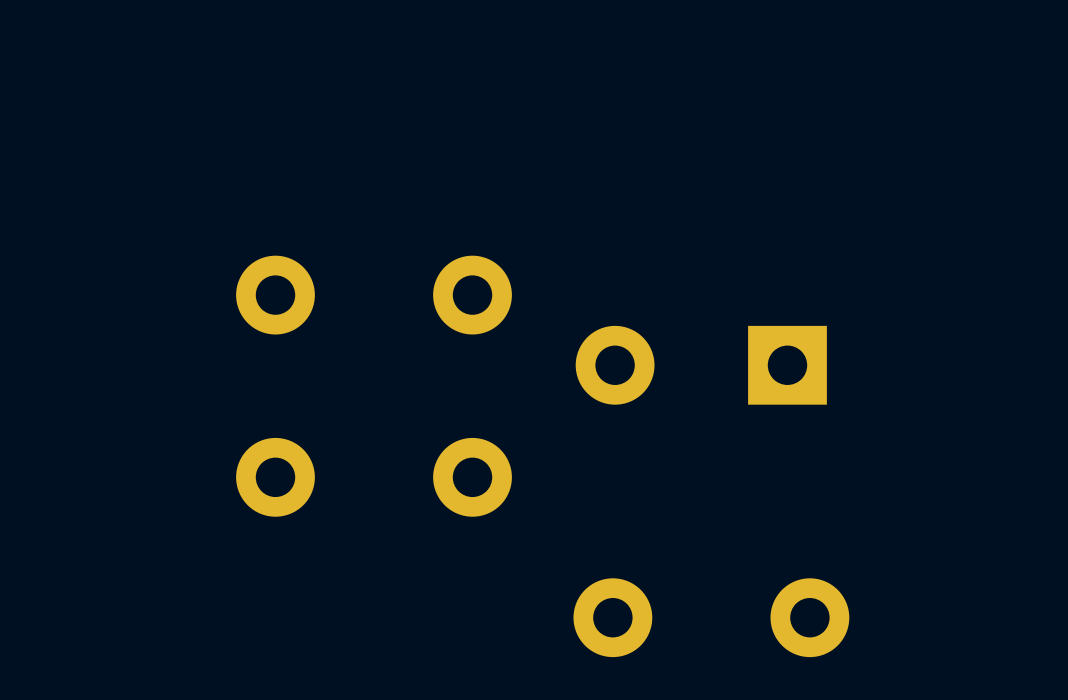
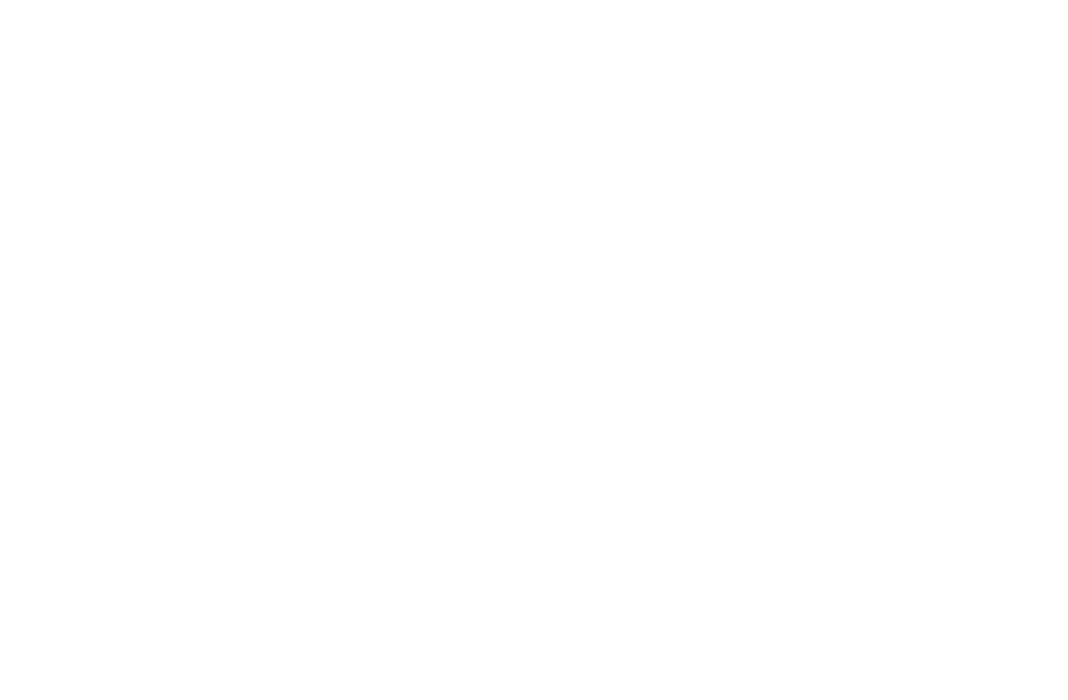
part: (374, 295) -> none
part: (701, 365) -> none
part: (374, 477) -> none
part: (711, 617) -> none

